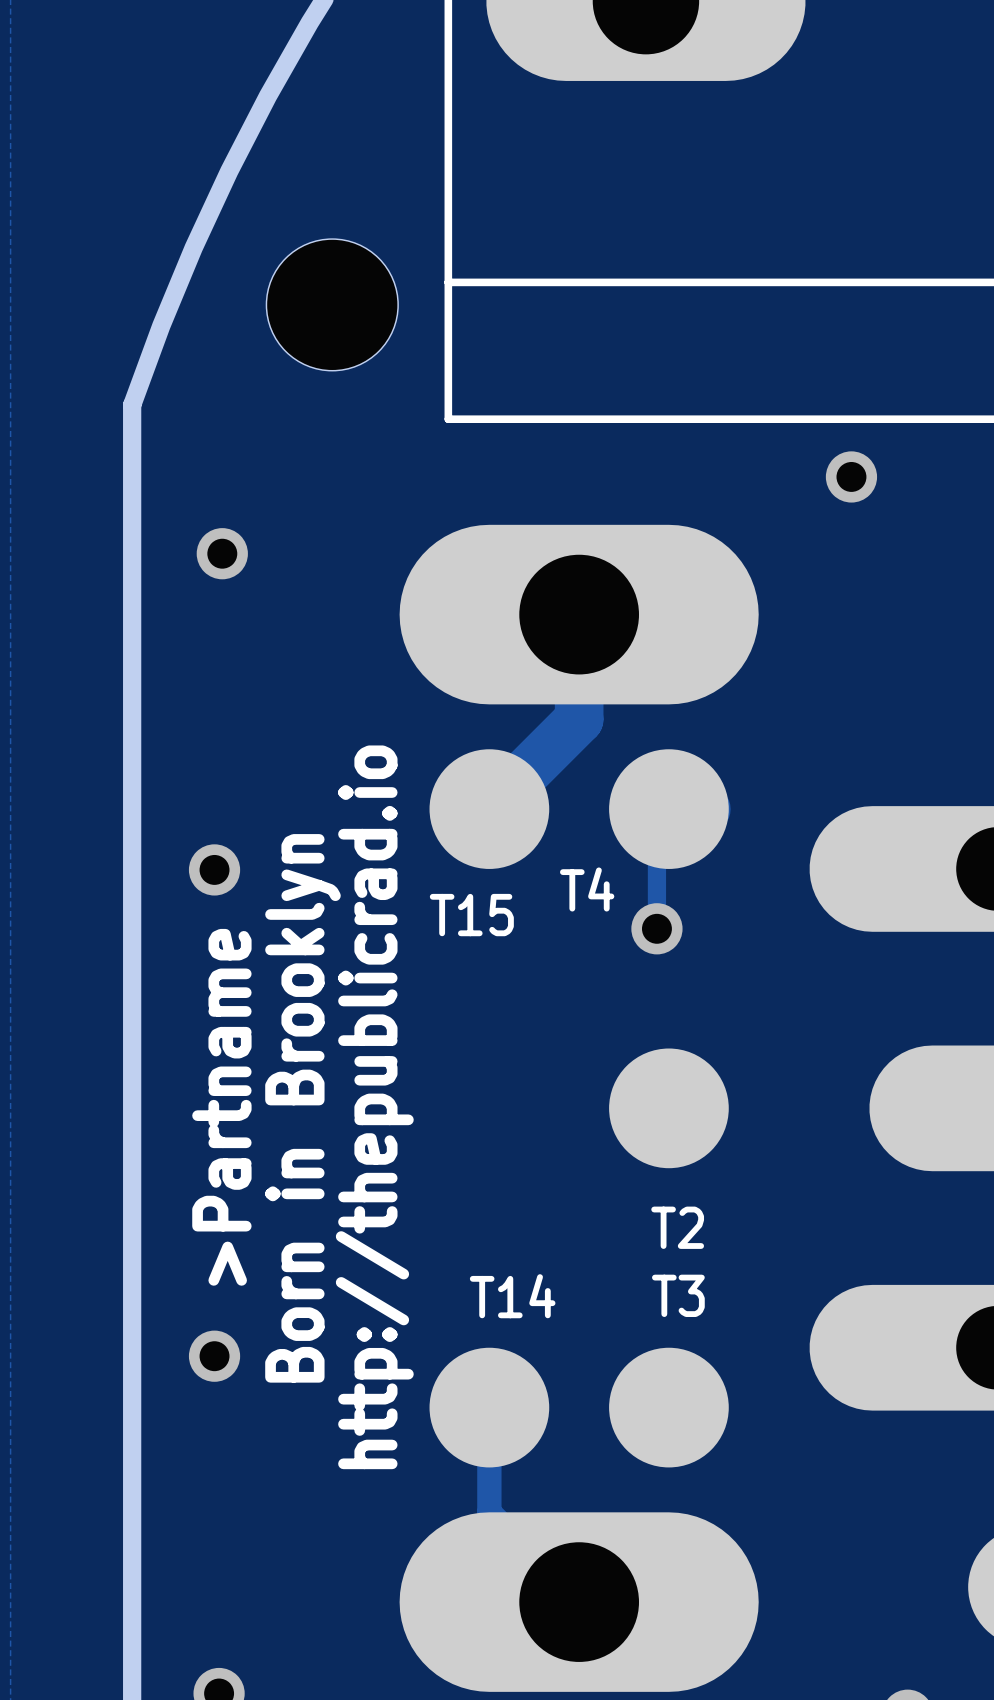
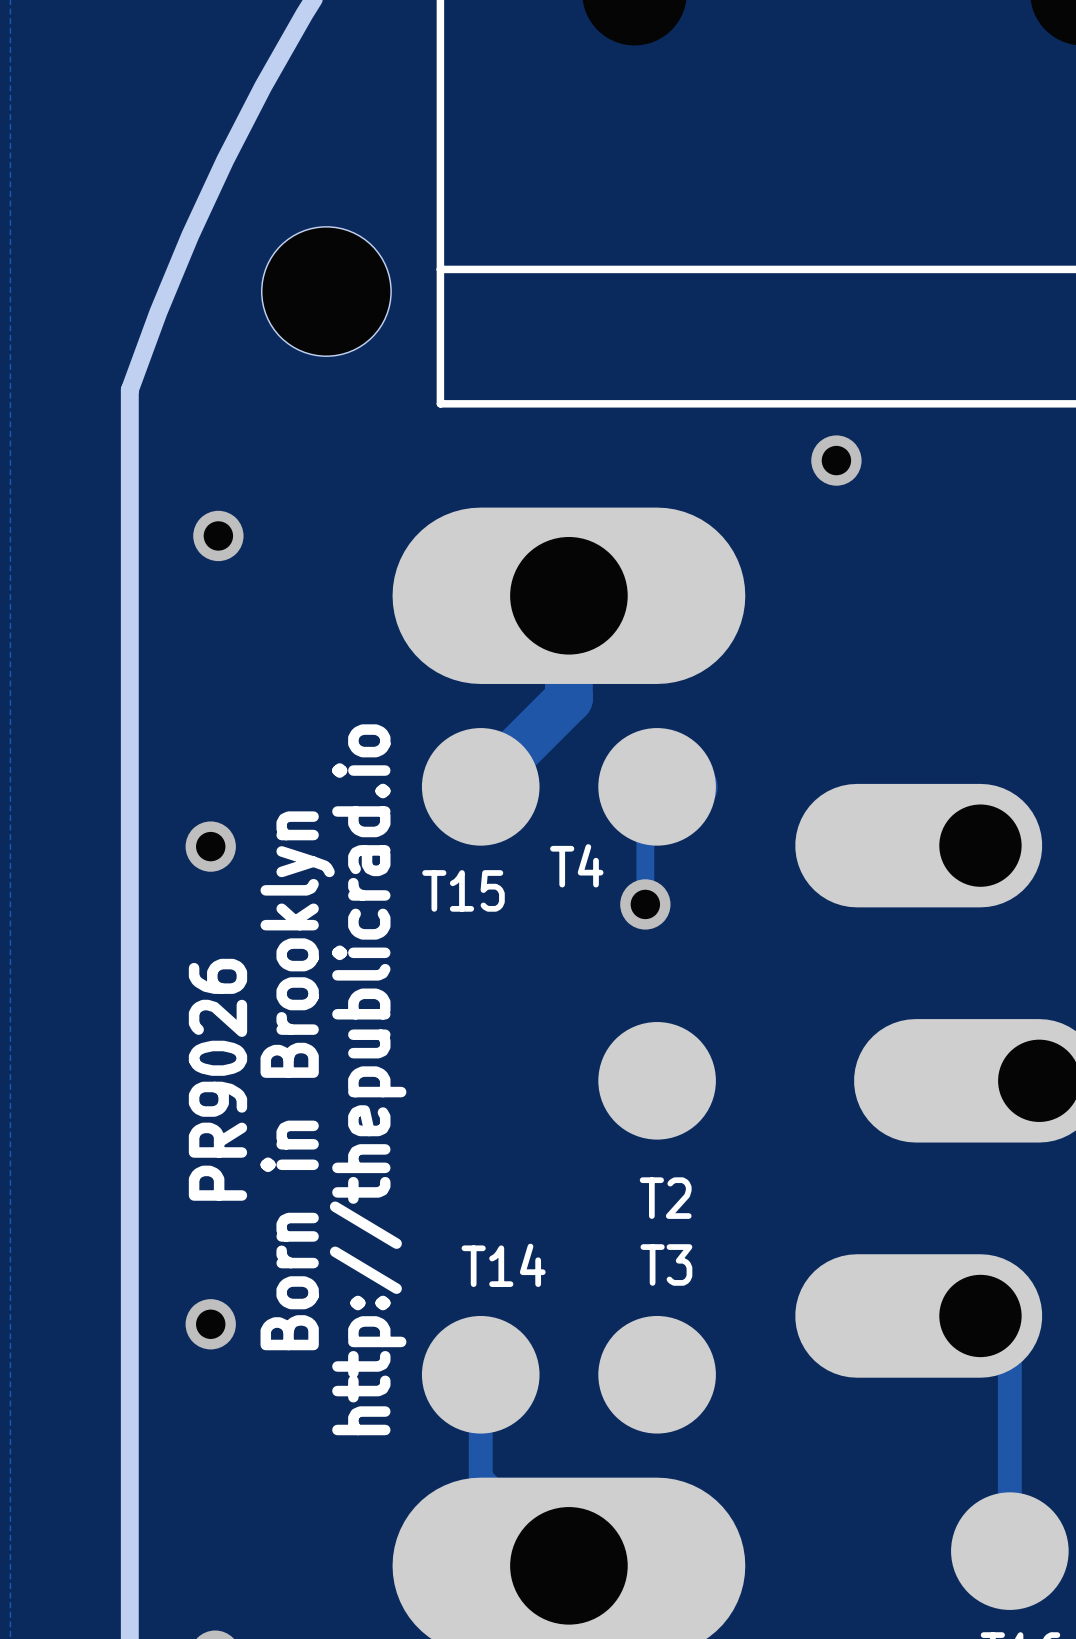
text: >Partname (221, 1107) -> PR9026 (217, 1079)

